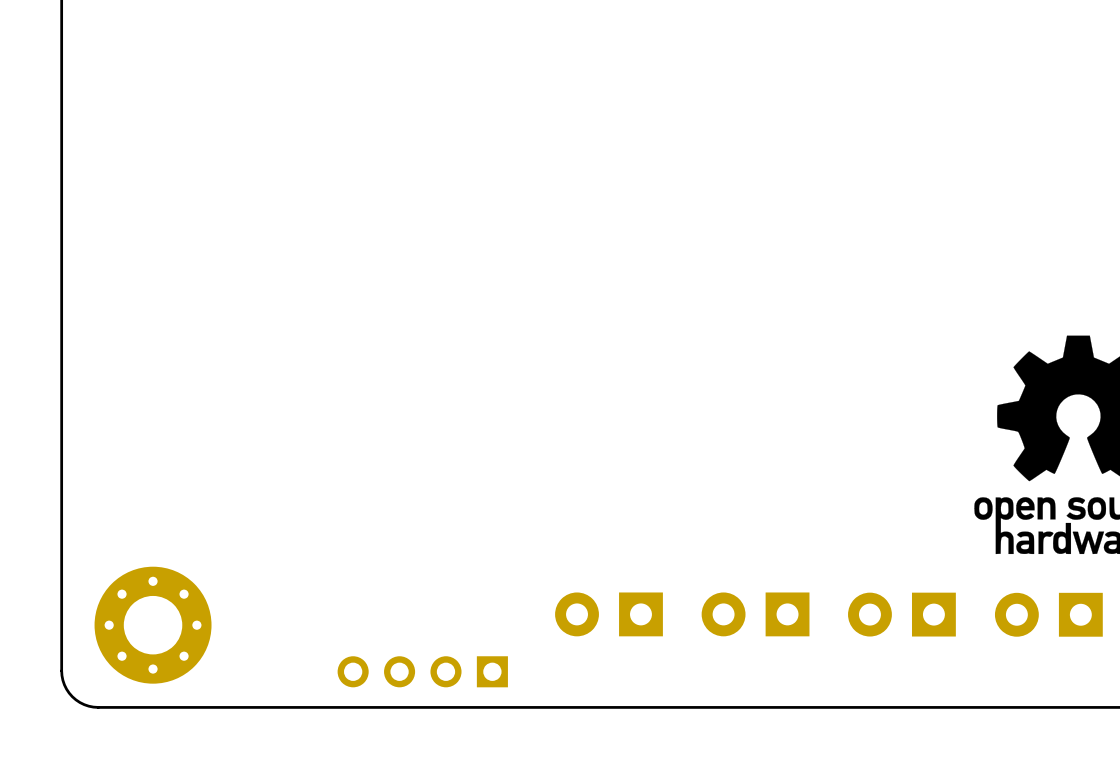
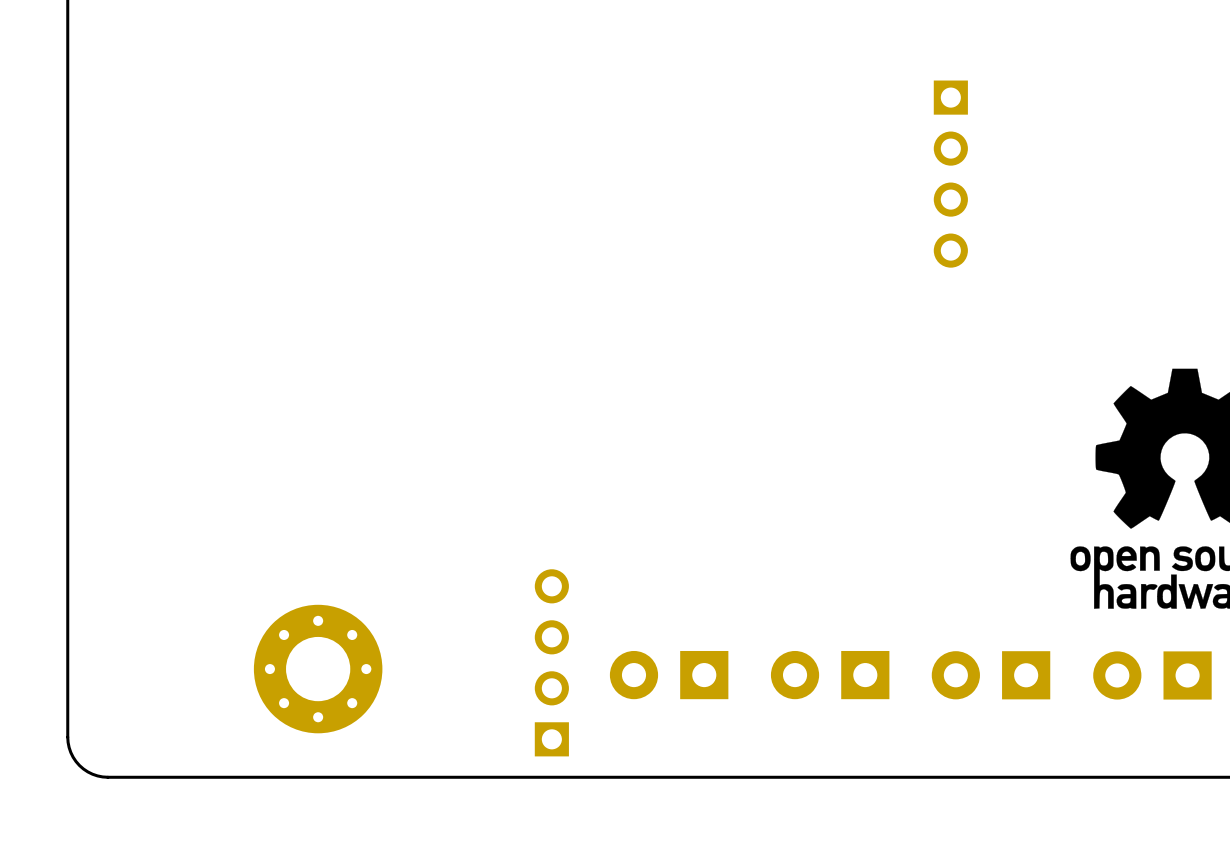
part: none -> (950, 174)
part position: (153, 625) -> (318, 669)
part rotation: 0° (422, 671) -> 90° clockwise (551, 662)
part position: (422, 671) -> (551, 662)

